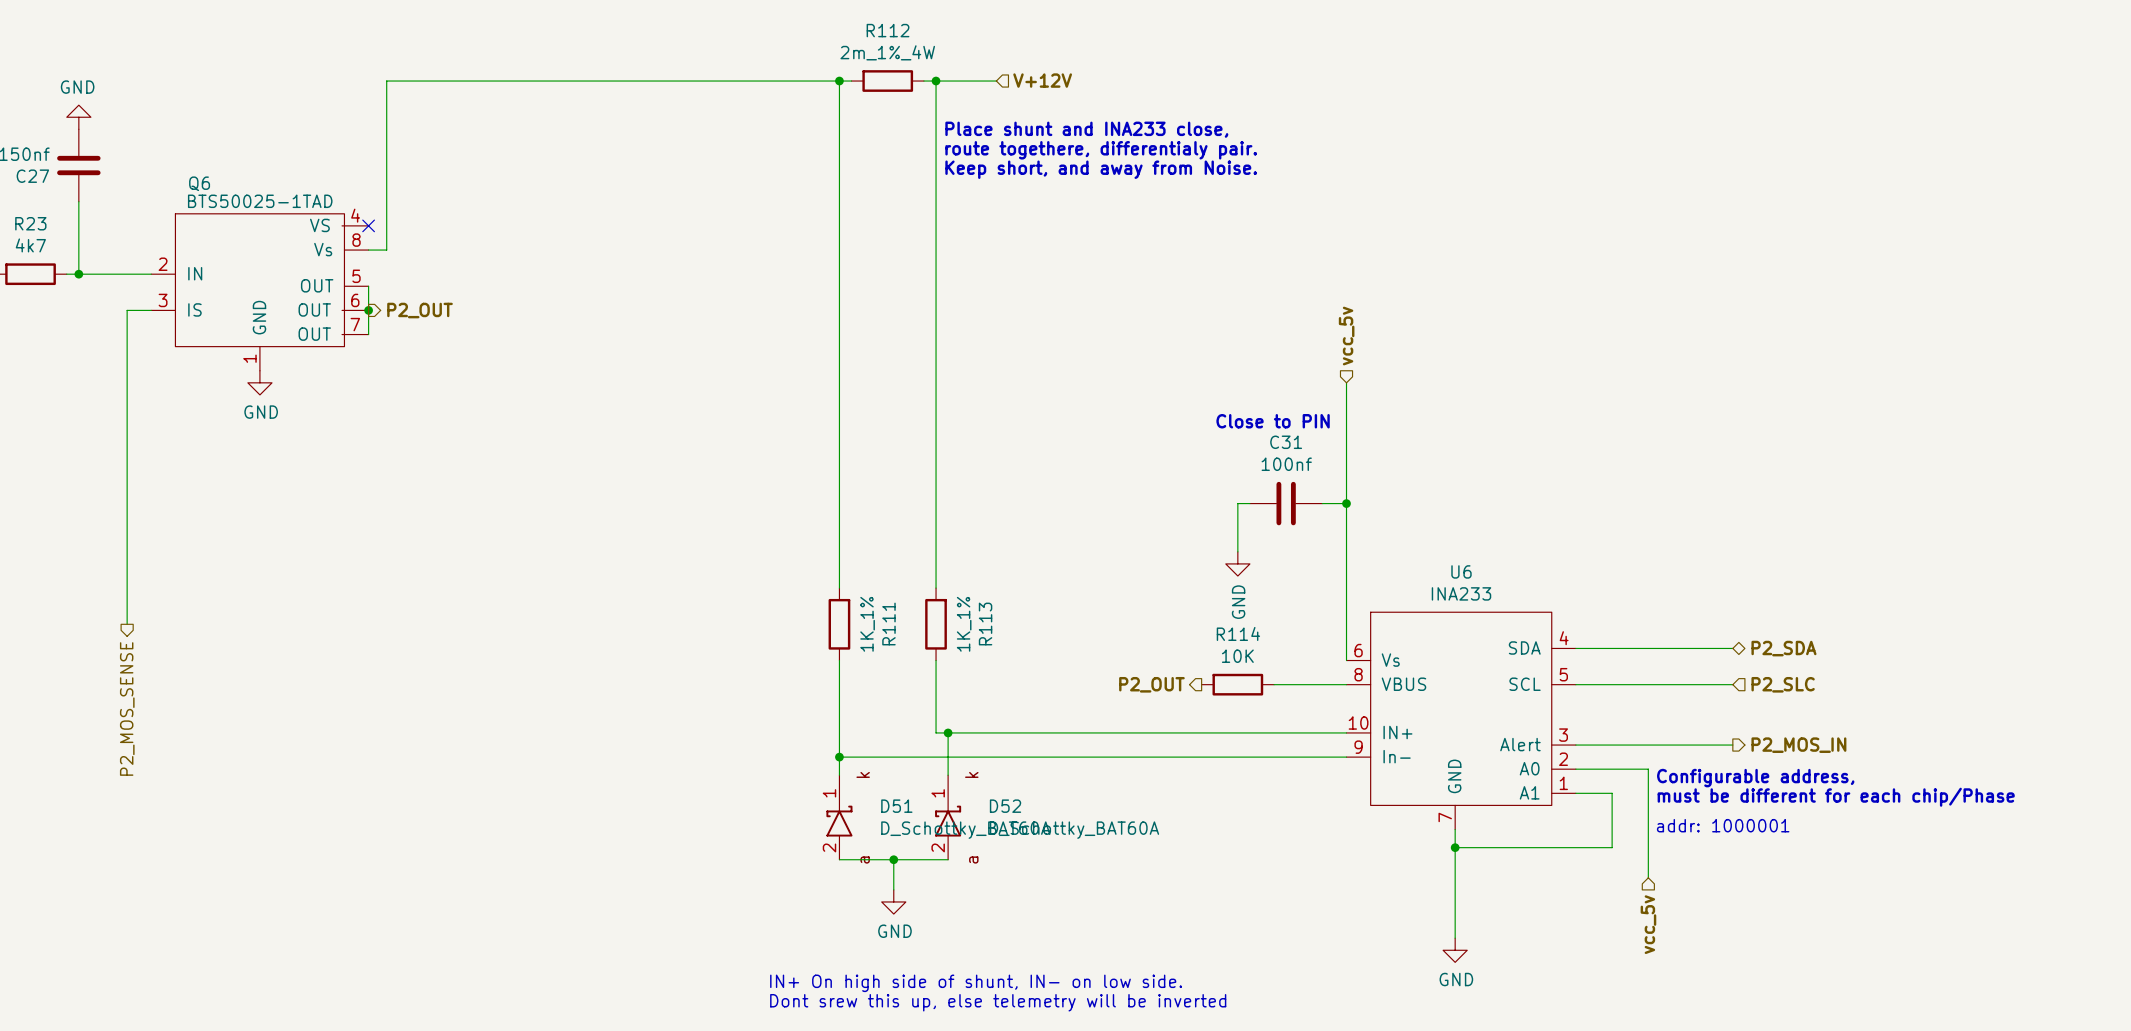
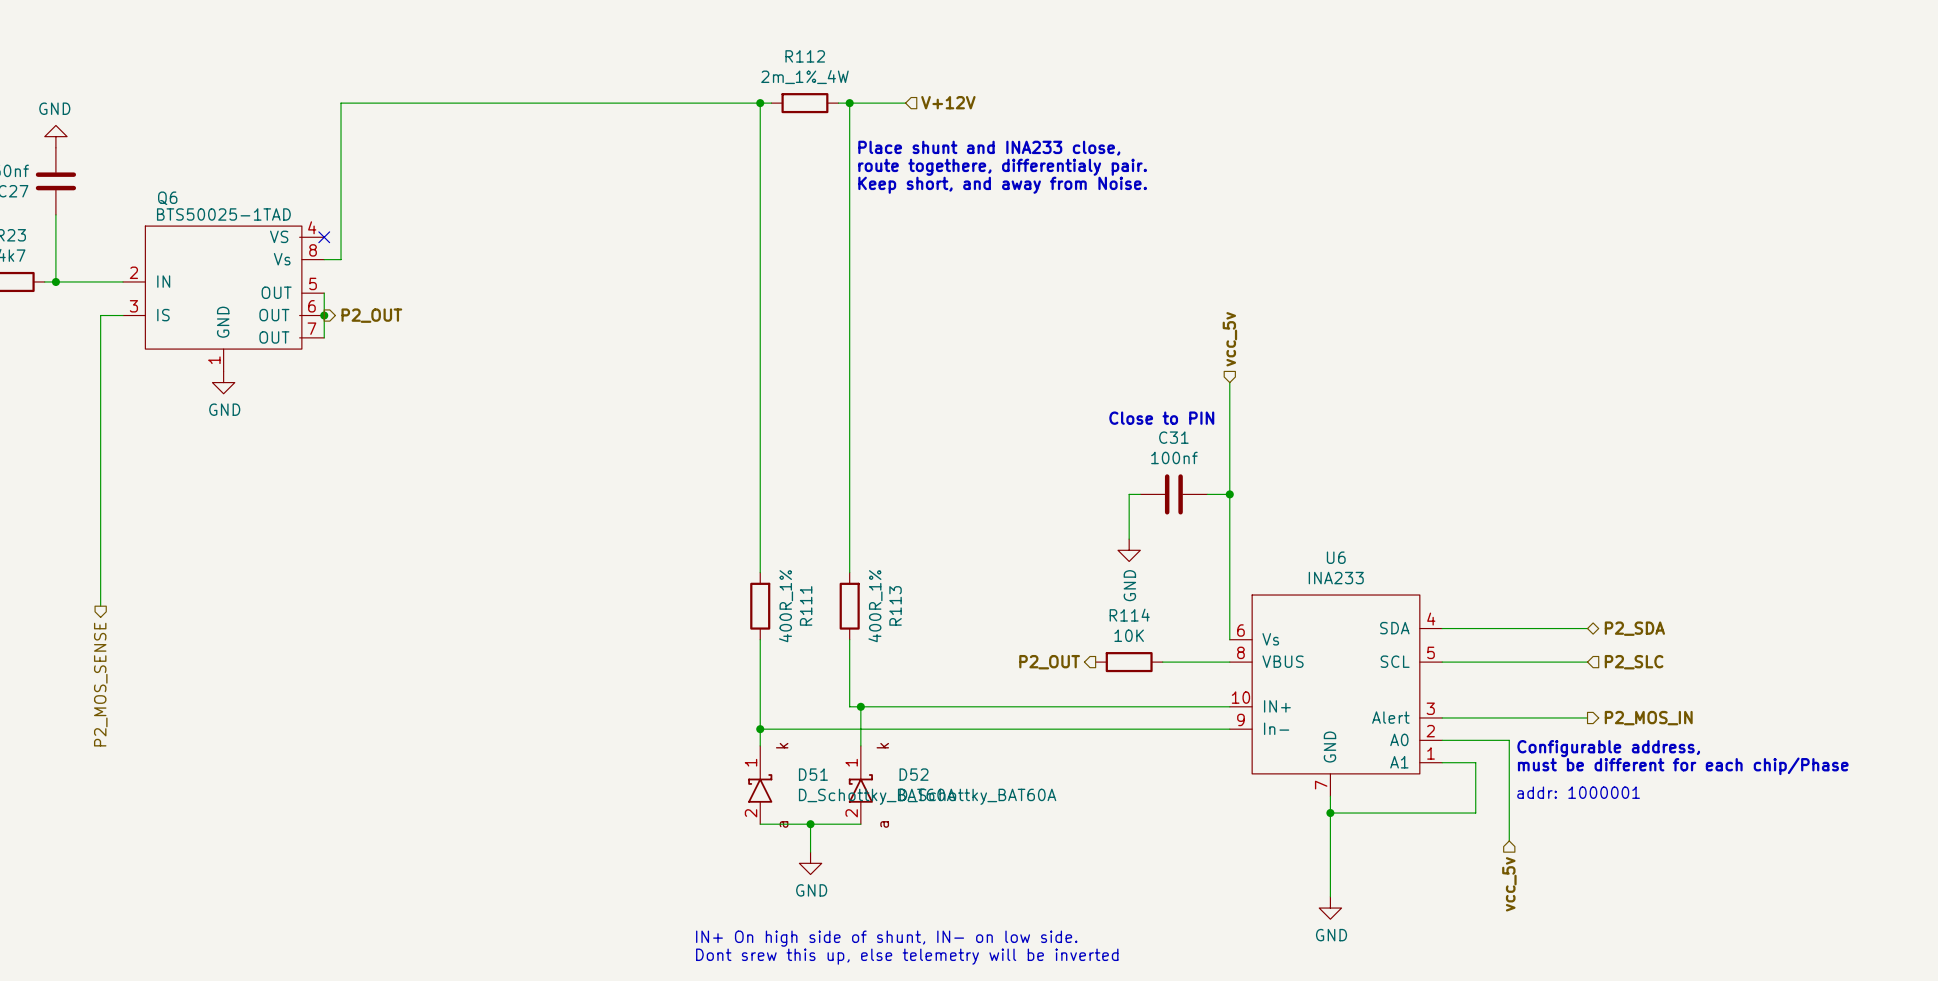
R111 value: 1K_1% (867, 624) -> 400R_1% (786, 606)
R113 value: 1K_1% (964, 624) -> 400R_1% (875, 606)

